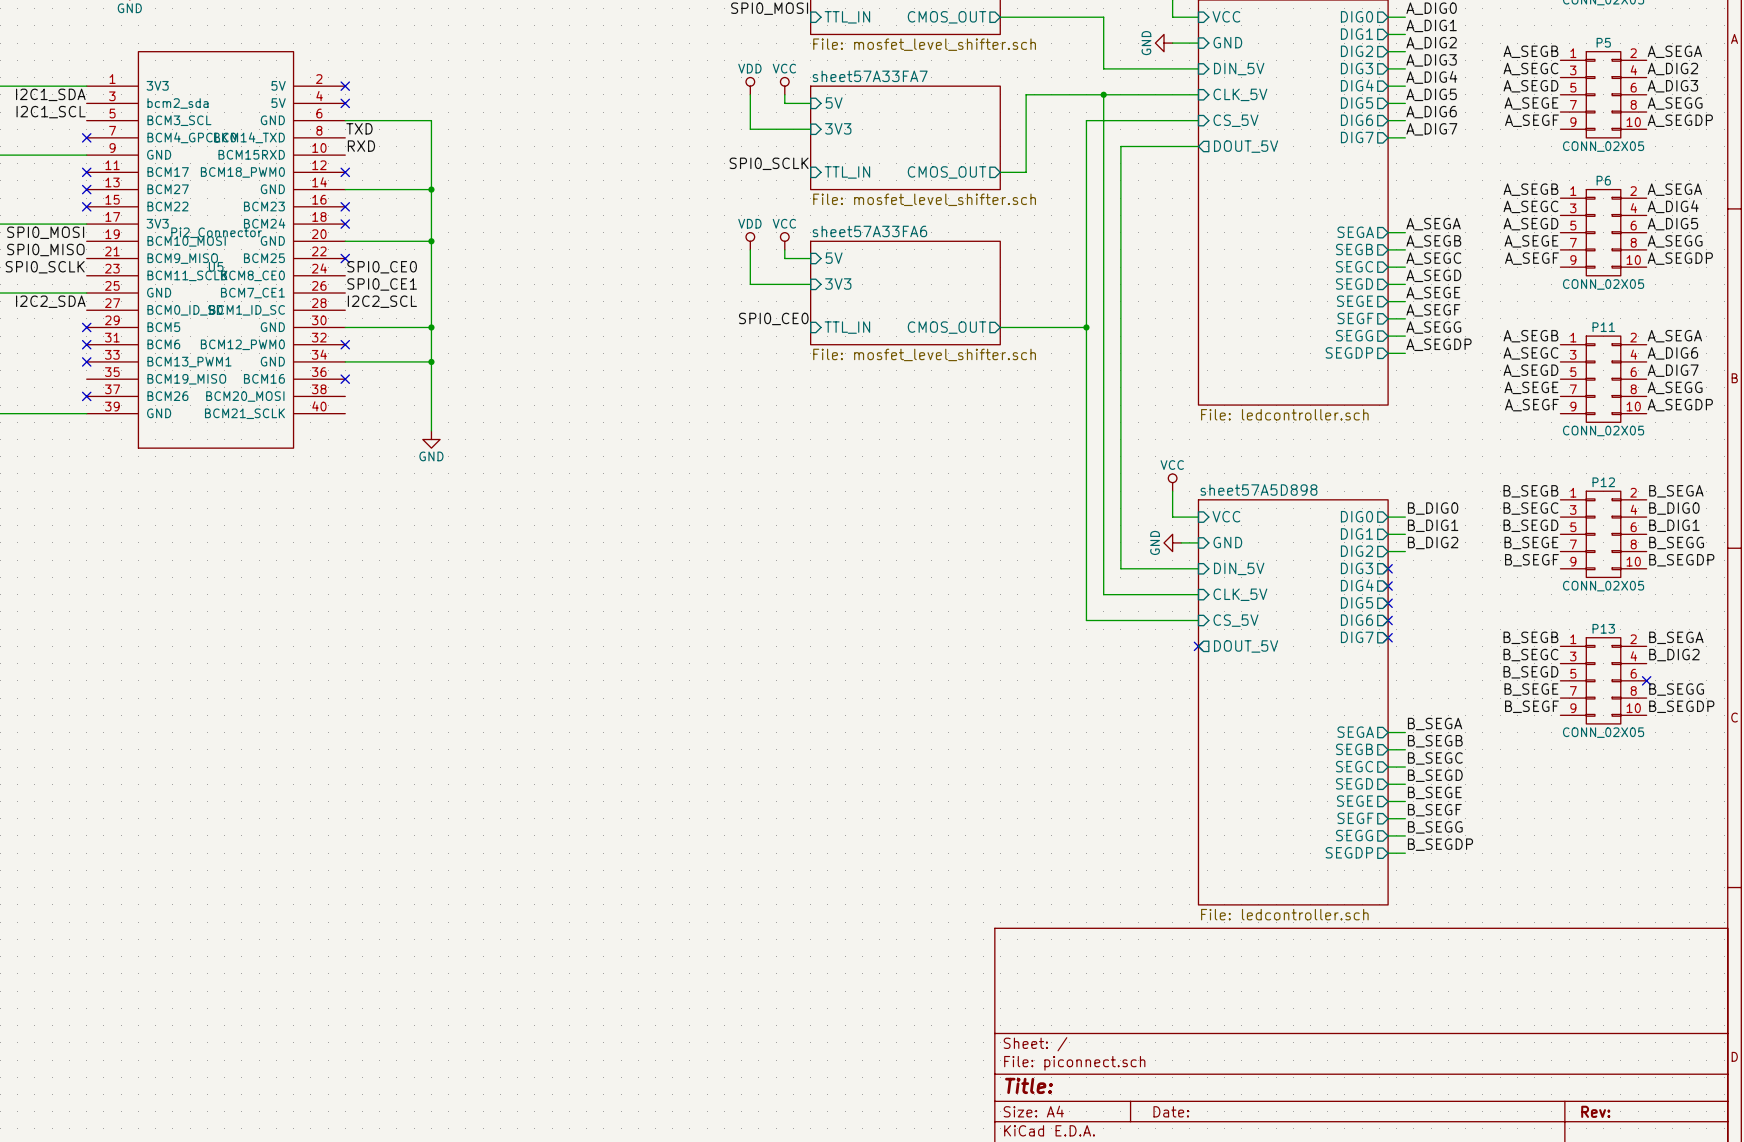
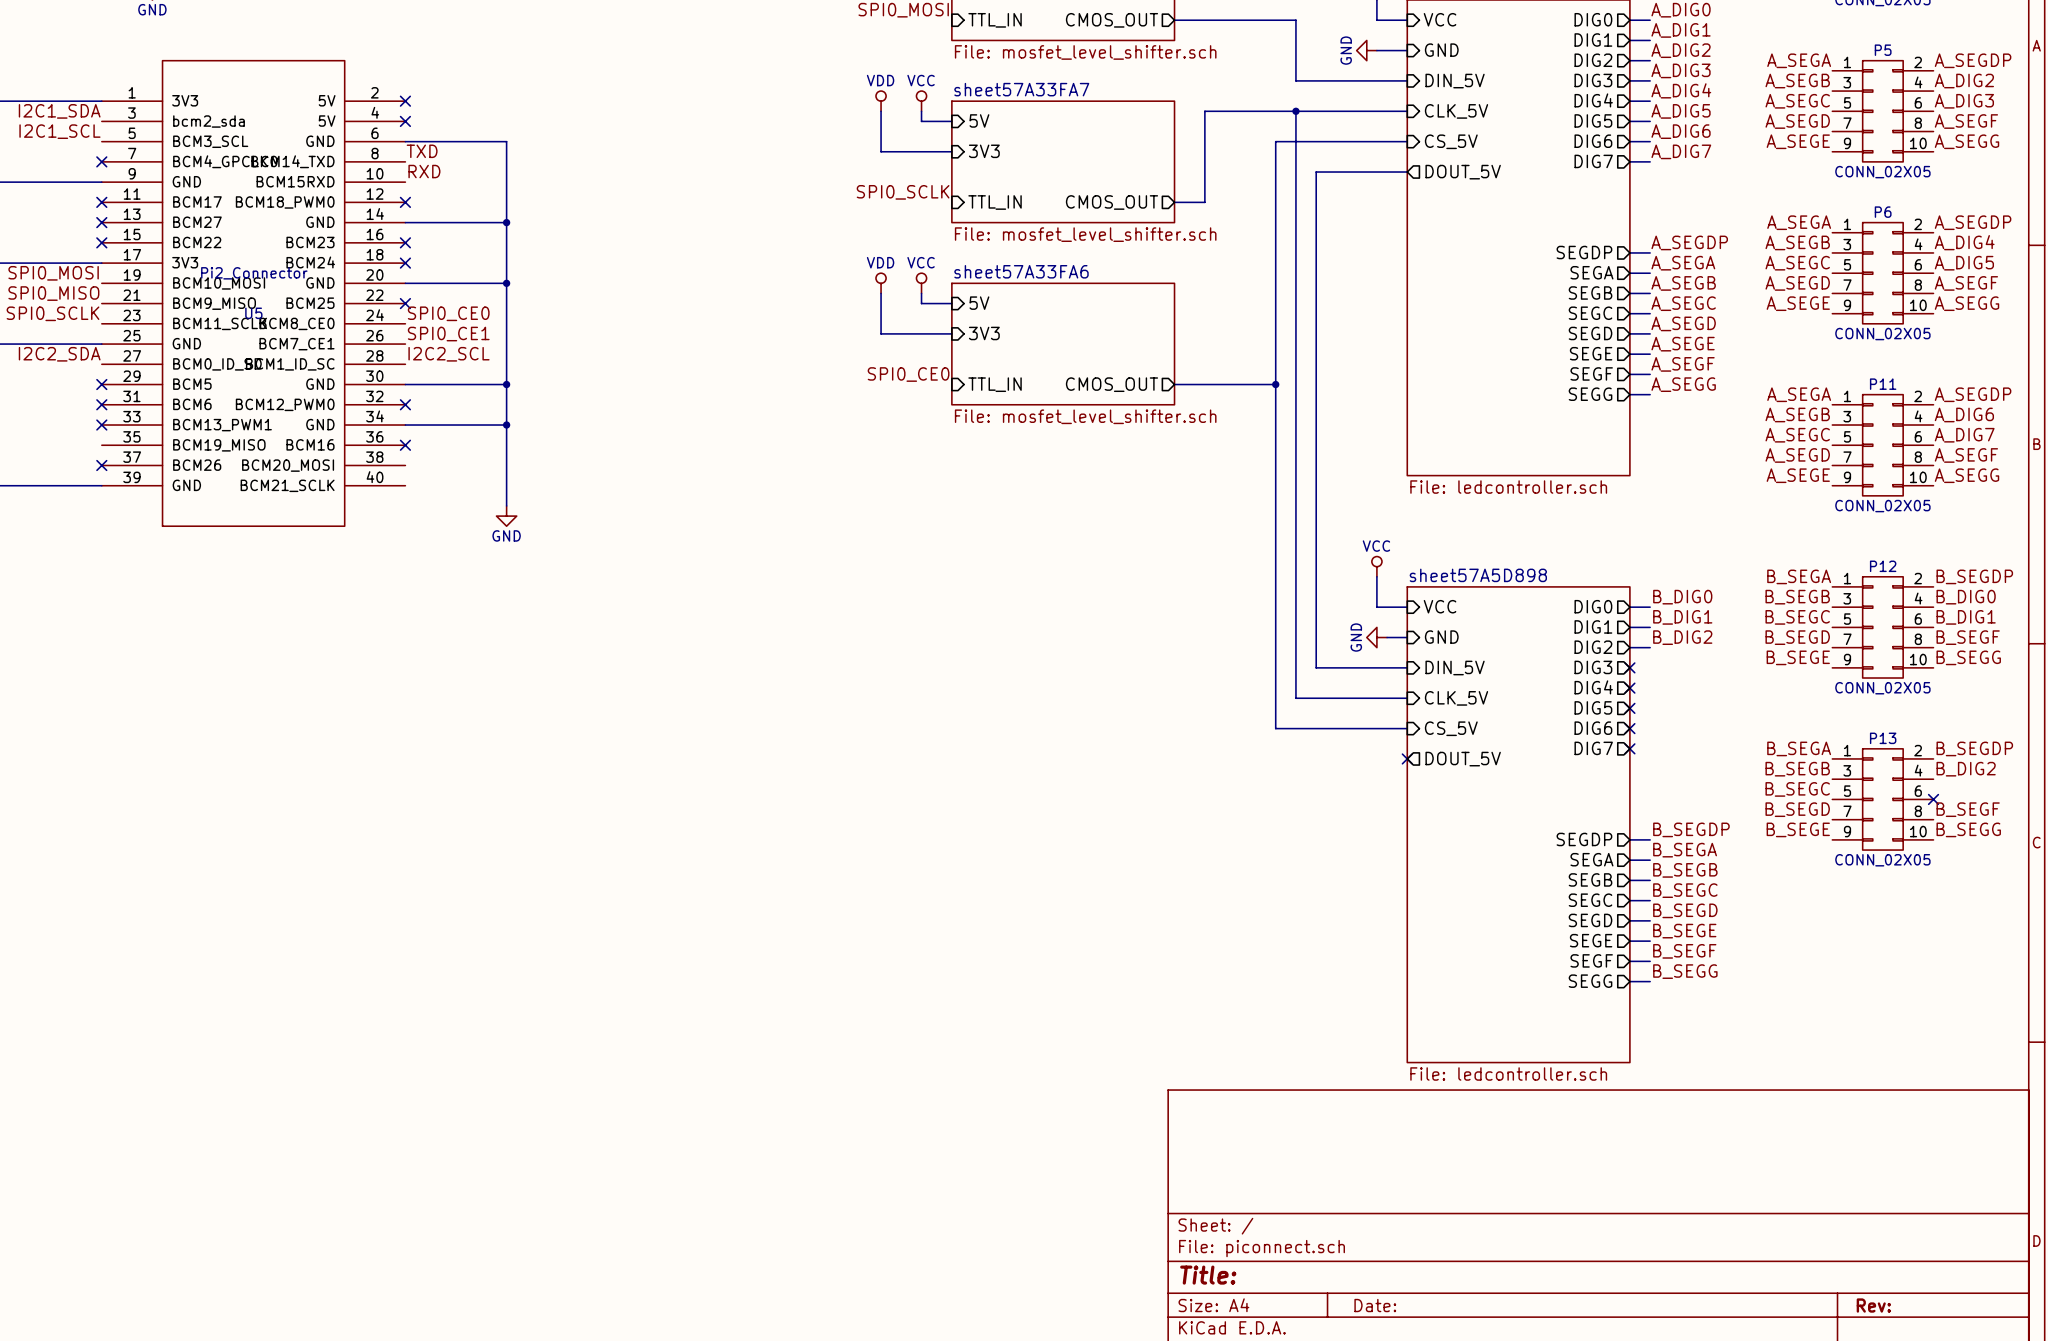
label: A_SEGB (1530, 51) -> A_SEGA (1799, 60)
label: A_SEGA (1674, 51) -> A_SEGDP (1973, 60)
label: A_SEGC (1530, 69) -> A_SEGB (1797, 81)
label: A_SEGD (1530, 86) -> A_SEGC (1797, 101)
label: A_SEGE (1531, 103) -> A_SEGD (1797, 121)
label: A_SEGG (1675, 103) -> A_SEGF (1966, 121)
label: A_SEGF (1531, 120) -> A_SEGE (1798, 141)
label: A_SEGDP (1680, 120) -> A_SEGG (1966, 141)
label: A_SEGB (1530, 189) -> A_SEGA (1799, 222)
label: A_SEGA (1674, 189) -> A_SEGDP (1973, 222)
label: A_SEGC (1530, 206) -> A_SEGB (1797, 242)
label: A_SEGD (1530, 224) -> A_SEGC (1797, 263)
label: A_SEGE (1531, 241) -> A_SEGD (1797, 283)
label: A_SEGG (1675, 241) -> A_SEGF (1966, 283)
label: A_SEGF (1531, 258) -> A_SEGE (1798, 303)
label: A_SEGDP (1680, 258) -> A_SEGG (1966, 303)
label: A_SEGB (1530, 336) -> A_SEGA (1799, 394)
label: A_SEGA (1674, 336) -> A_SEGDP (1973, 394)
label position: A_SEGDP (1439, 344) -> A_SEGDP (1689, 242)
sheet pin position: SEGDP (1349, 352) -> SEGDP (1584, 252)
wire: (1388, 353) (1405, 353) -> (1629, 252) (1650, 252)
label: A_SEGC (1530, 353) -> A_SEGB (1797, 414)
label: A_SEGD (1530, 370) -> A_SEGC (1797, 435)
label: A_SEGE (1531, 387) -> A_SEGD (1797, 455)
label: A_SEGG (1675, 387) -> A_SEGF (1966, 455)
label: A_SEGF (1531, 405) -> A_SEGE (1798, 475)
label: A_SEGDP (1680, 405) -> A_SEGG (1966, 475)
label: B_SEGB (1530, 491) -> B_SEGA (1799, 576)
label: B_SEGA (1676, 491) -> B_SEGDP (1974, 576)
label: B_SEGC (1530, 508) -> B_SEGB (1797, 597)
label: B_SEGD (1530, 525) -> B_SEGC (1797, 617)
label: B_SEGE (1531, 543) -> B_SEGD (1797, 637)
label: B_SEGG (1676, 543) -> B_SEGF (1968, 637)
label: B_SEGF (1531, 560) -> B_SEGE (1798, 657)
label: B_SEGDP (1681, 560) -> B_SEGG (1968, 657)
label: B_SEGB (1530, 637) -> B_SEGA (1799, 748)
label: B_SEGA (1676, 637) -> B_SEGDP (1974, 748)
label: B_SEGC (1530, 655) -> B_SEGB (1797, 769)
label: B_SEGD (1530, 672) -> B_SEGC (1797, 789)
label: B_SEGE (1531, 689) -> B_SEGD (1797, 809)
label: B_SEGG (1676, 689) -> B_SEGF (1968, 809)
label: B_SEGF (1531, 706) -> B_SEGE (1798, 829)
label: B_SEGDP (1681, 706) -> B_SEGG (1968, 829)
label position: B_SEGDP (1440, 844) -> B_SEGDP (1691, 829)
sheet pin position: SEGDP (1349, 852) -> SEGDP (1584, 839)
wire: (1388, 853) (1405, 853) -> (1629, 839) (1650, 839)

